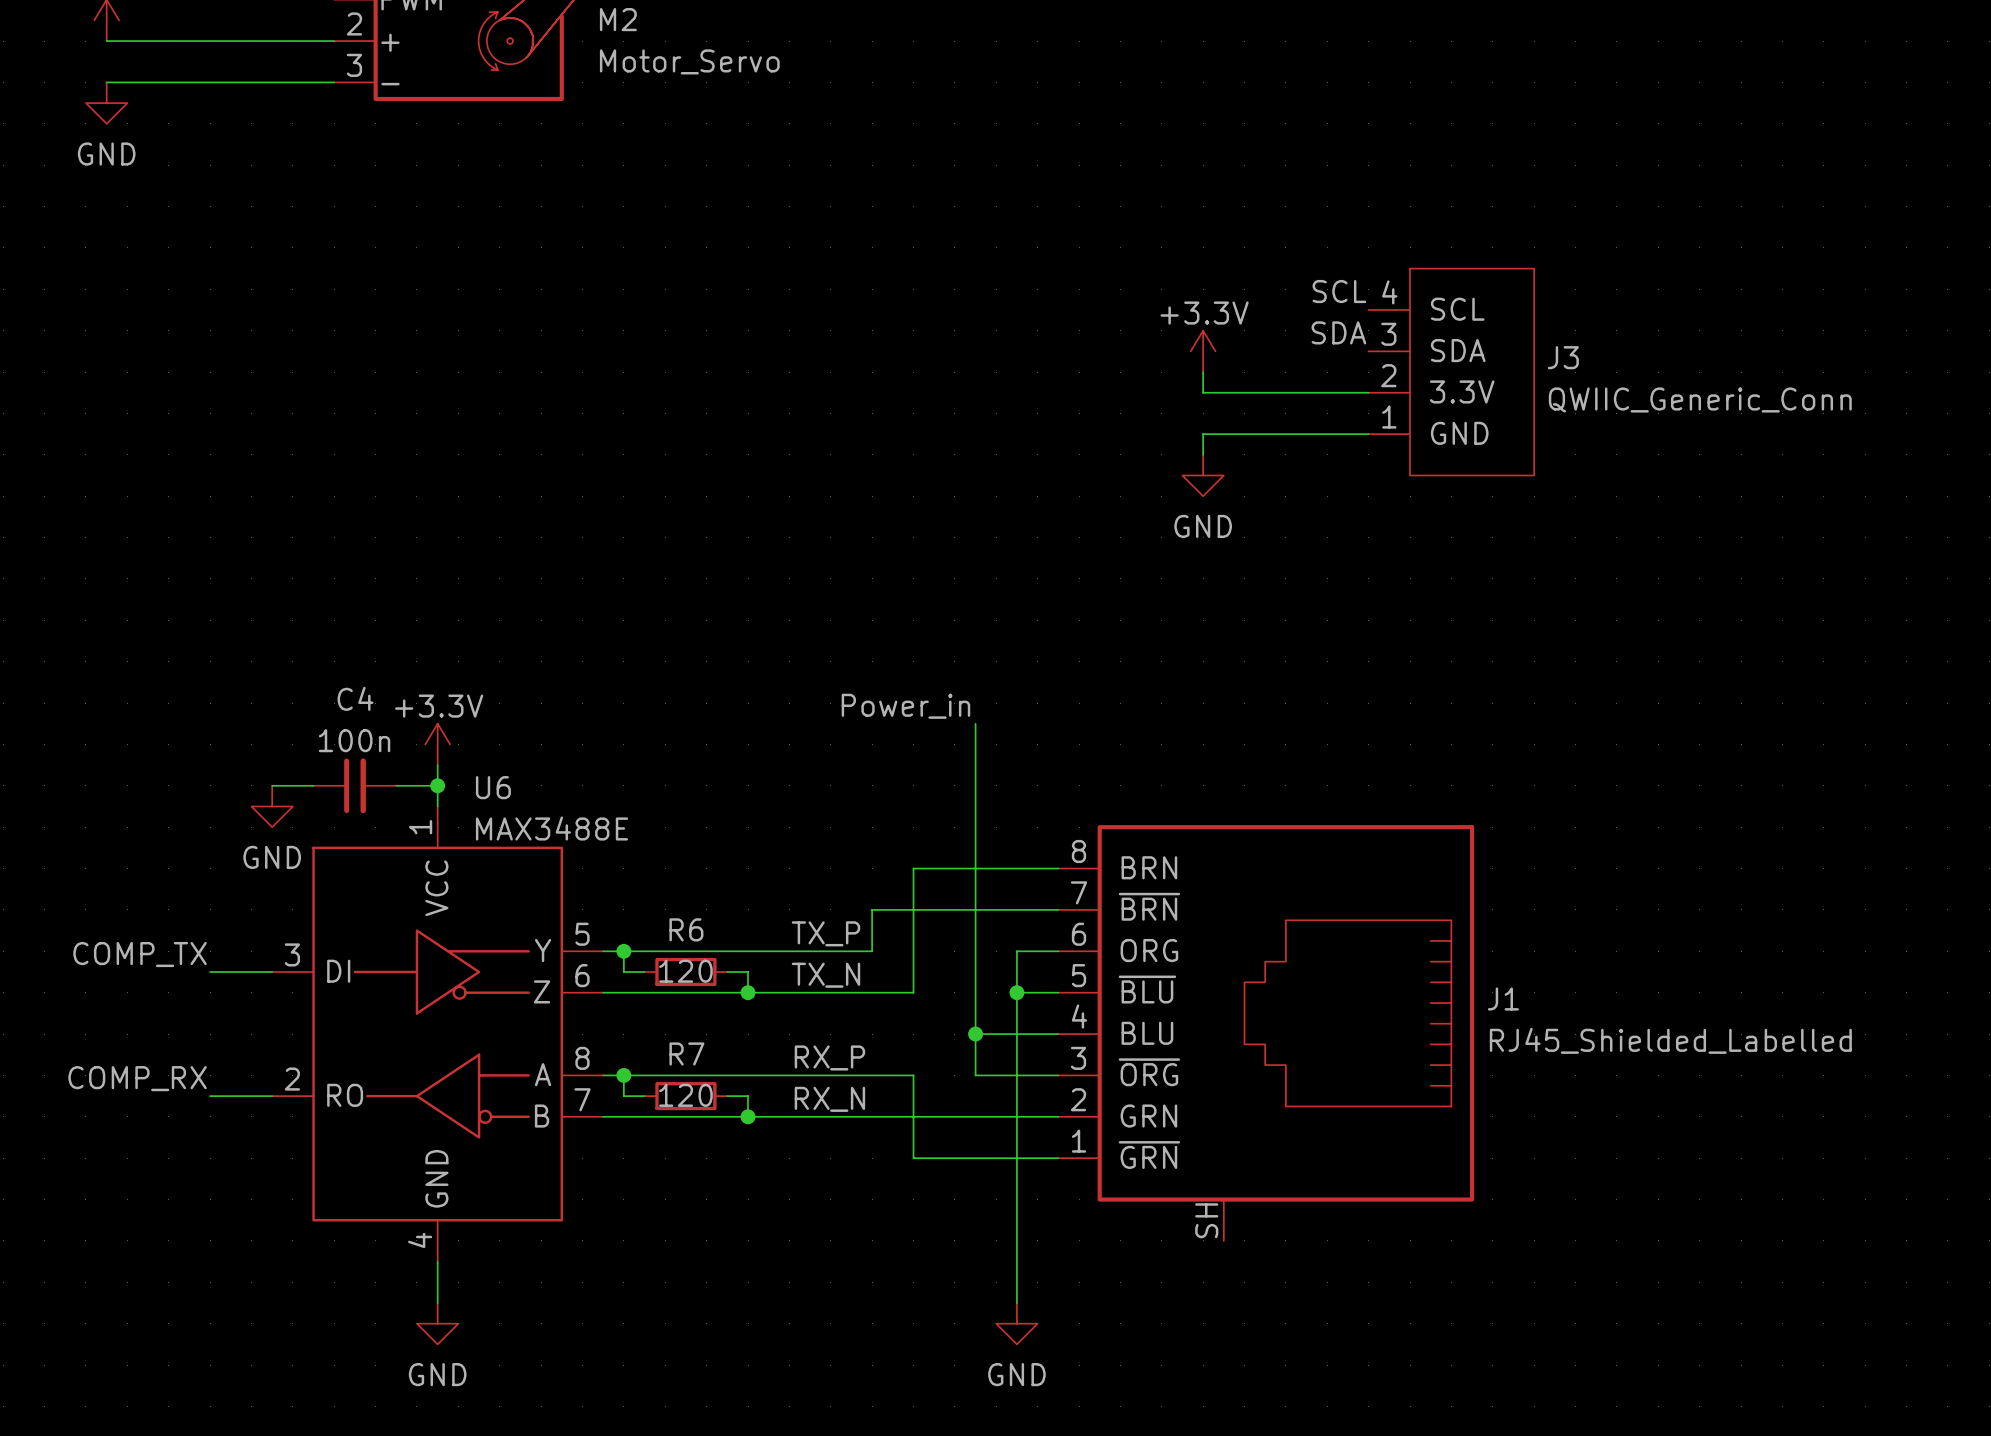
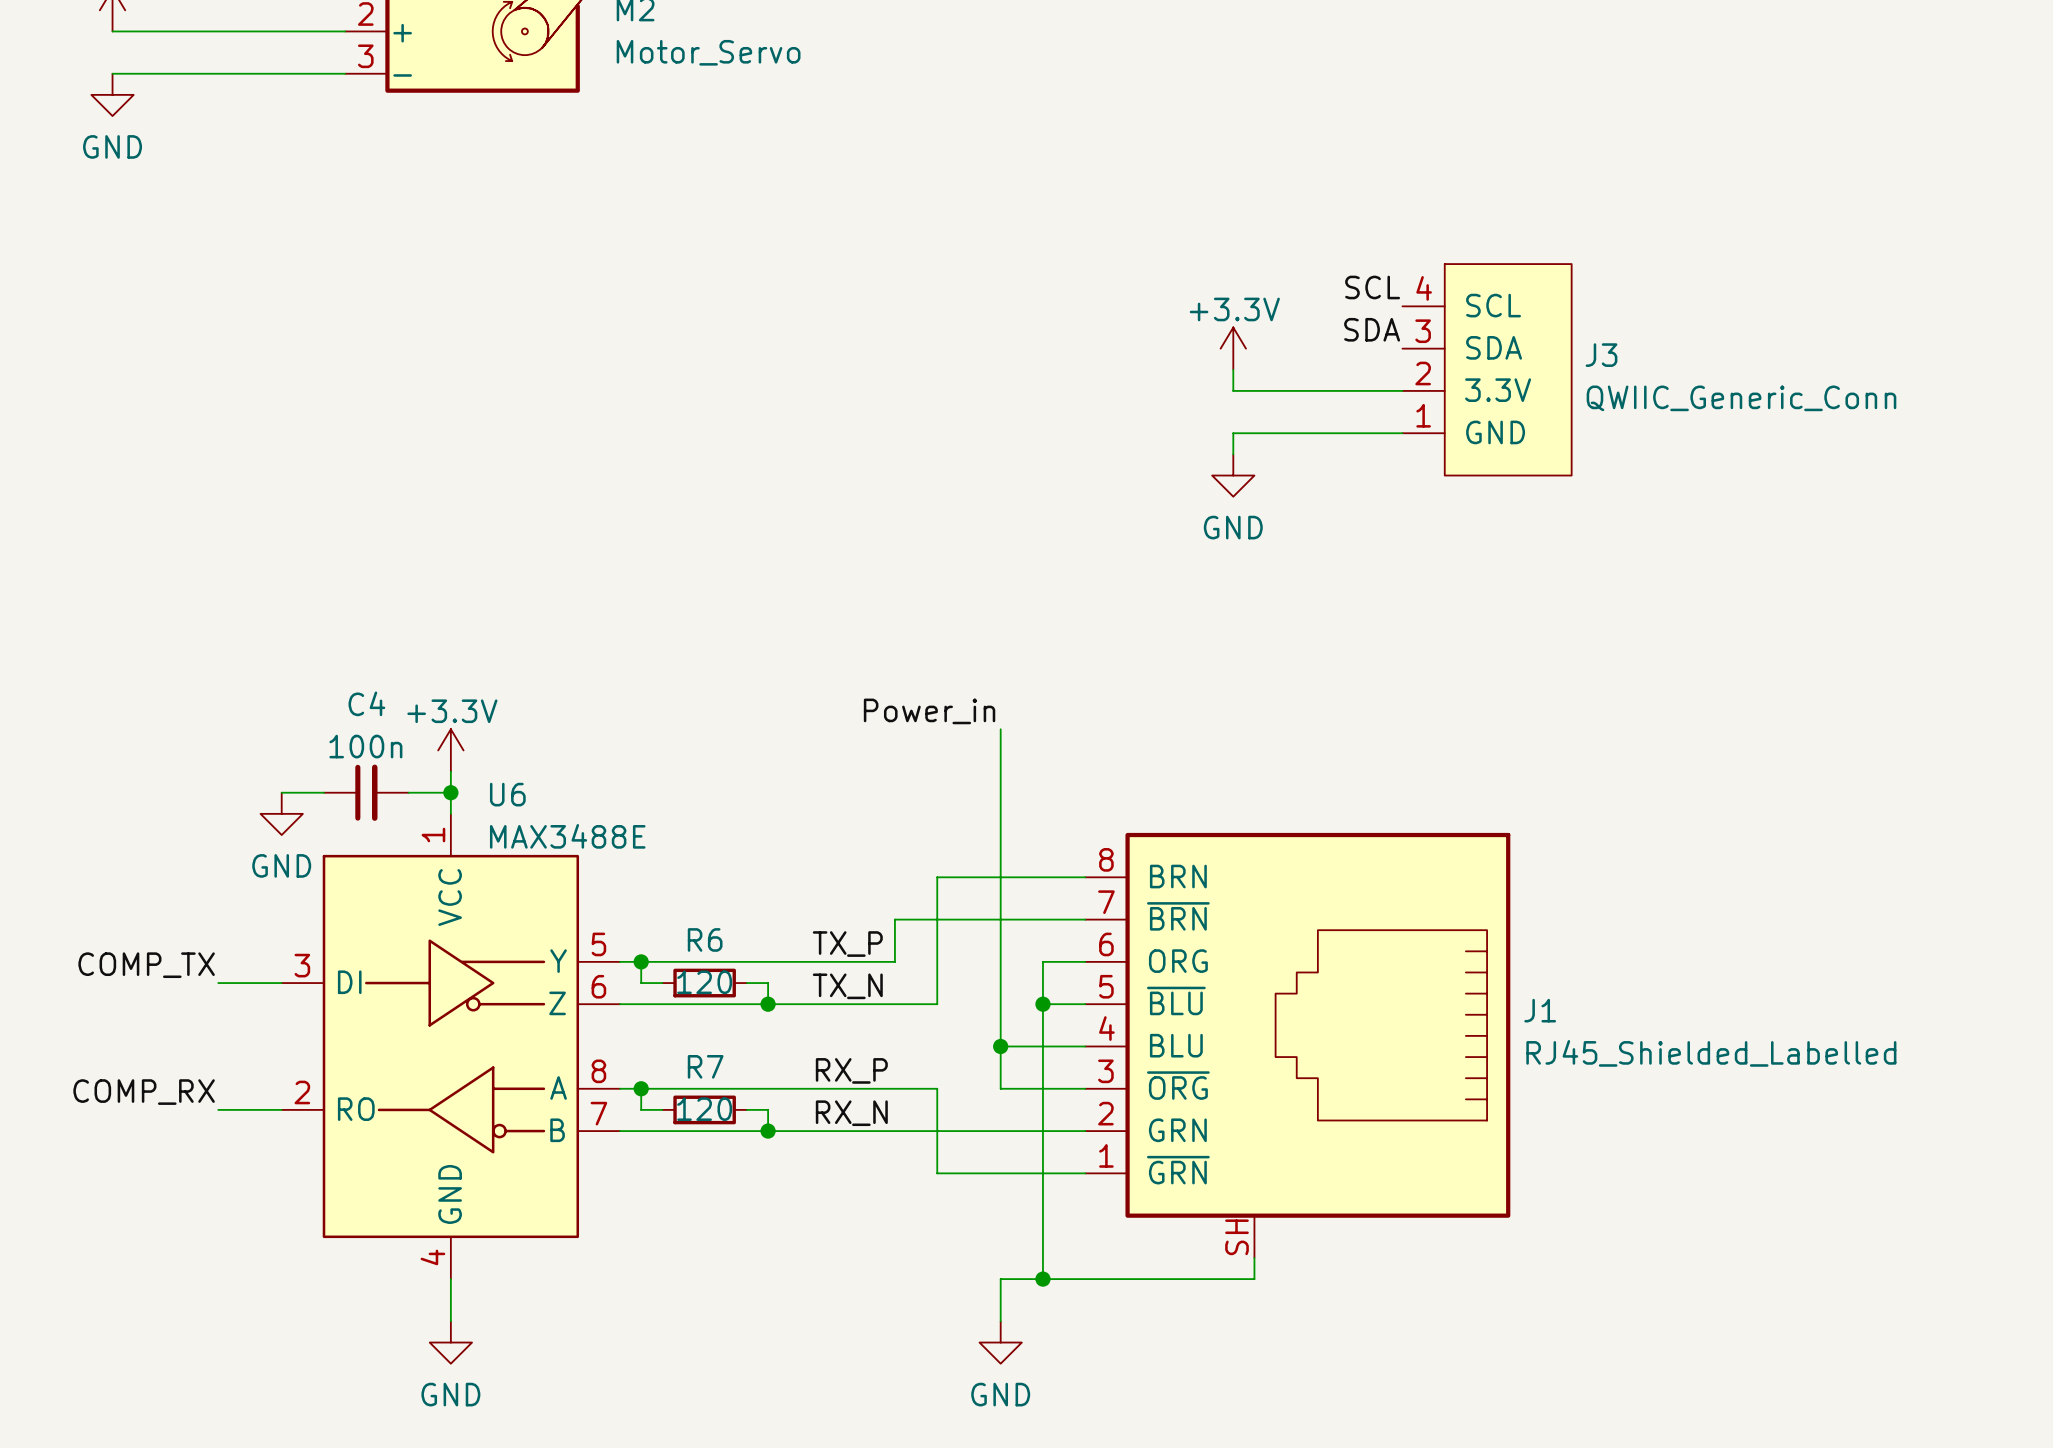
wire: none -> (1254, 1257) (1254, 1279) (1000, 1279) (1000, 1321)
wire: (1016, 1261) (1016, 1303) -> none
junction: none -> (1042, 1279)
power symbol position: GND (1016, 1323) -> GND (1000, 1342)

